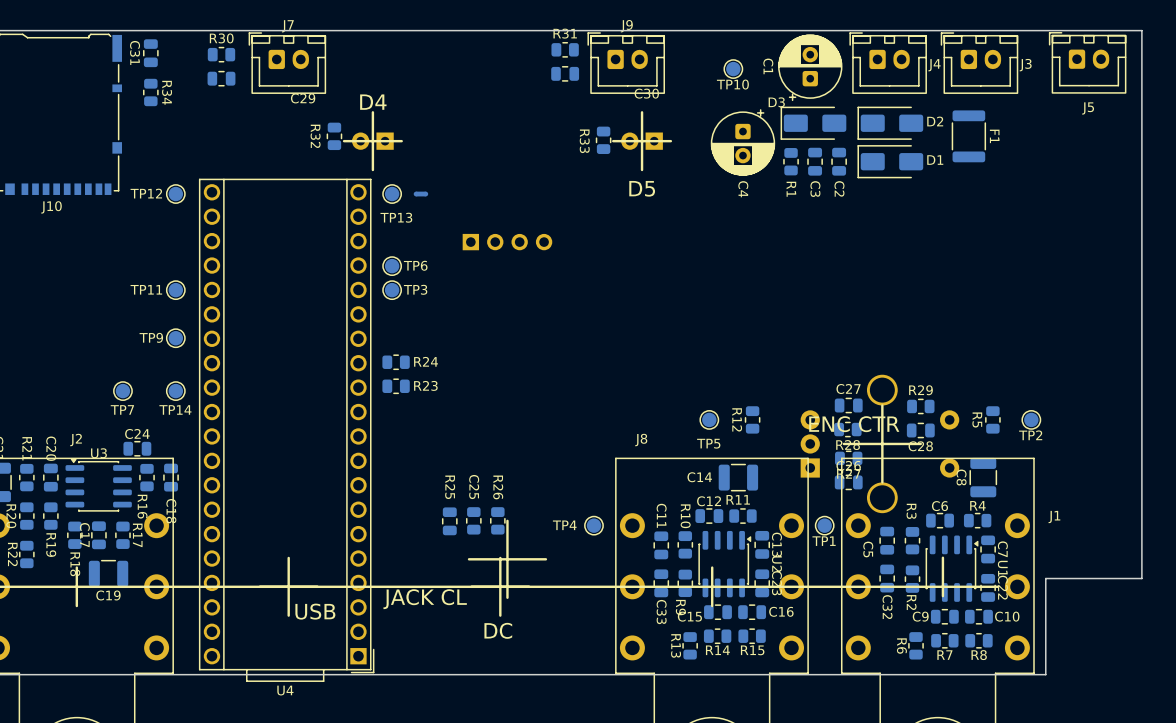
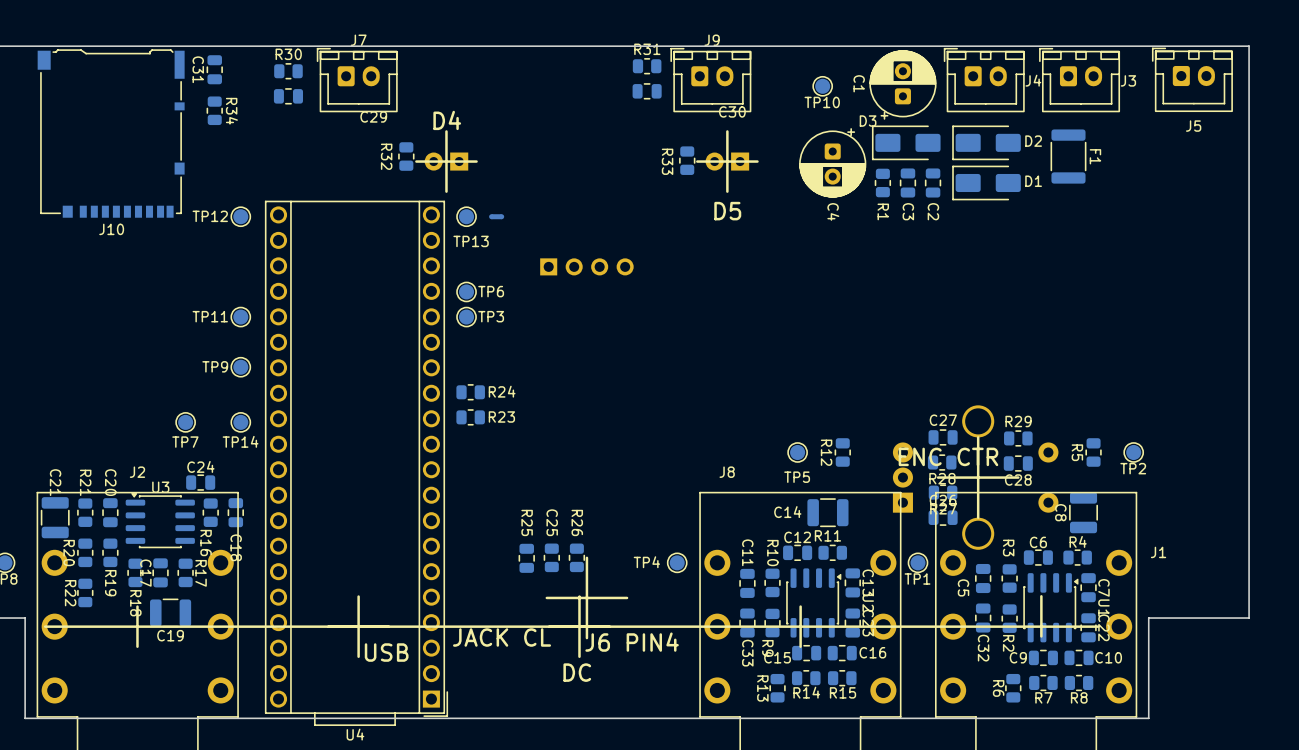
text: none -> J6 PIN4 (632, 642)

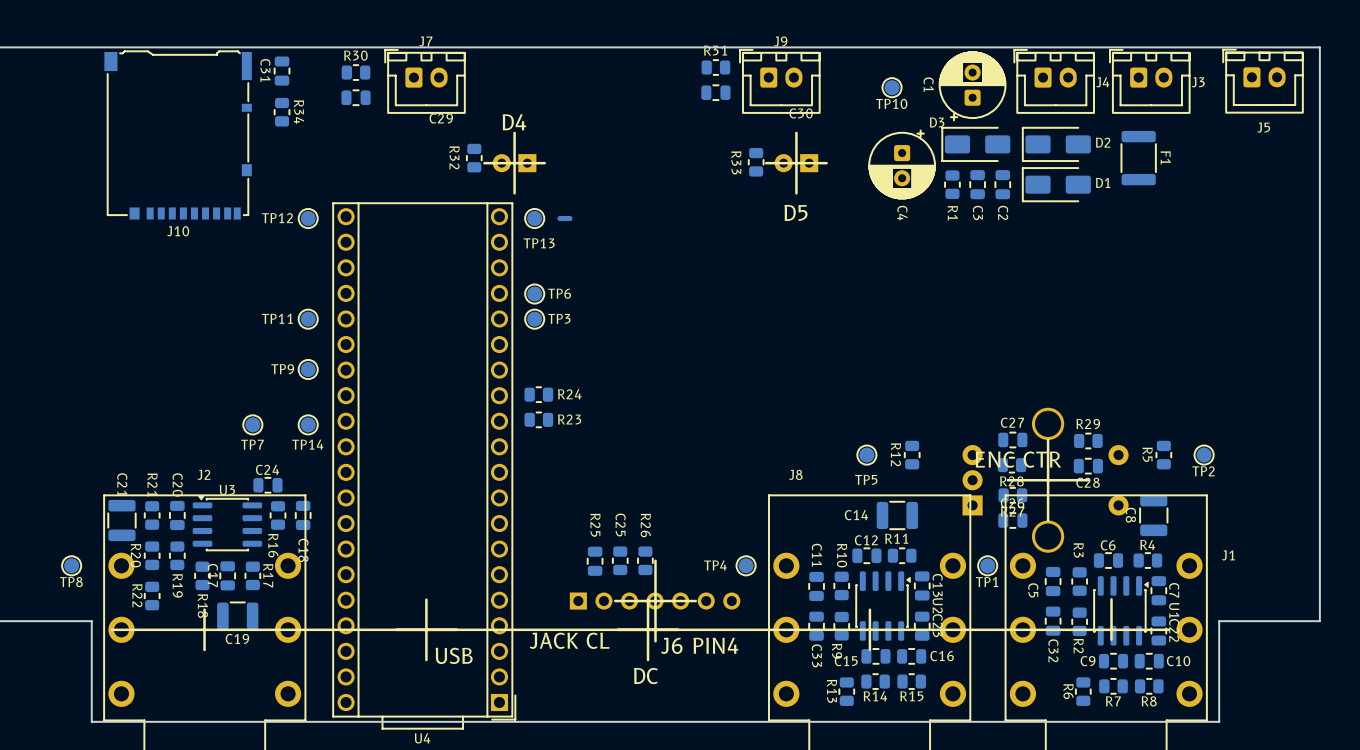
part: (586, 266) -> none
part: none -> (655, 601)

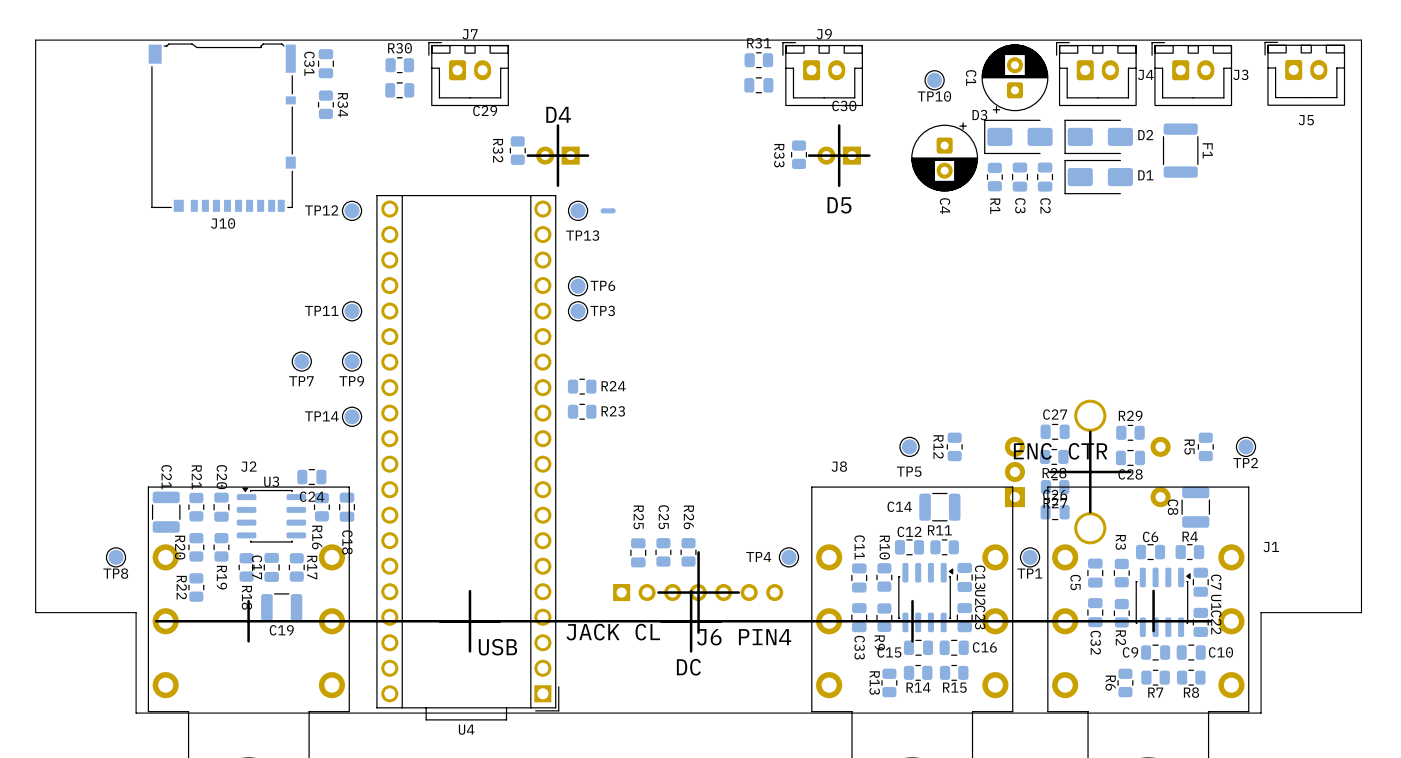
TP9 name position: TP9 (282, 369) -> TP9 (351, 381)
TP7 position: (252, 424) -> (301, 361)
TP14 name position: TP14 (307, 444) -> TP14 (321, 416)
C24 name position: C24 (267, 469) -> C24 (312, 496)

